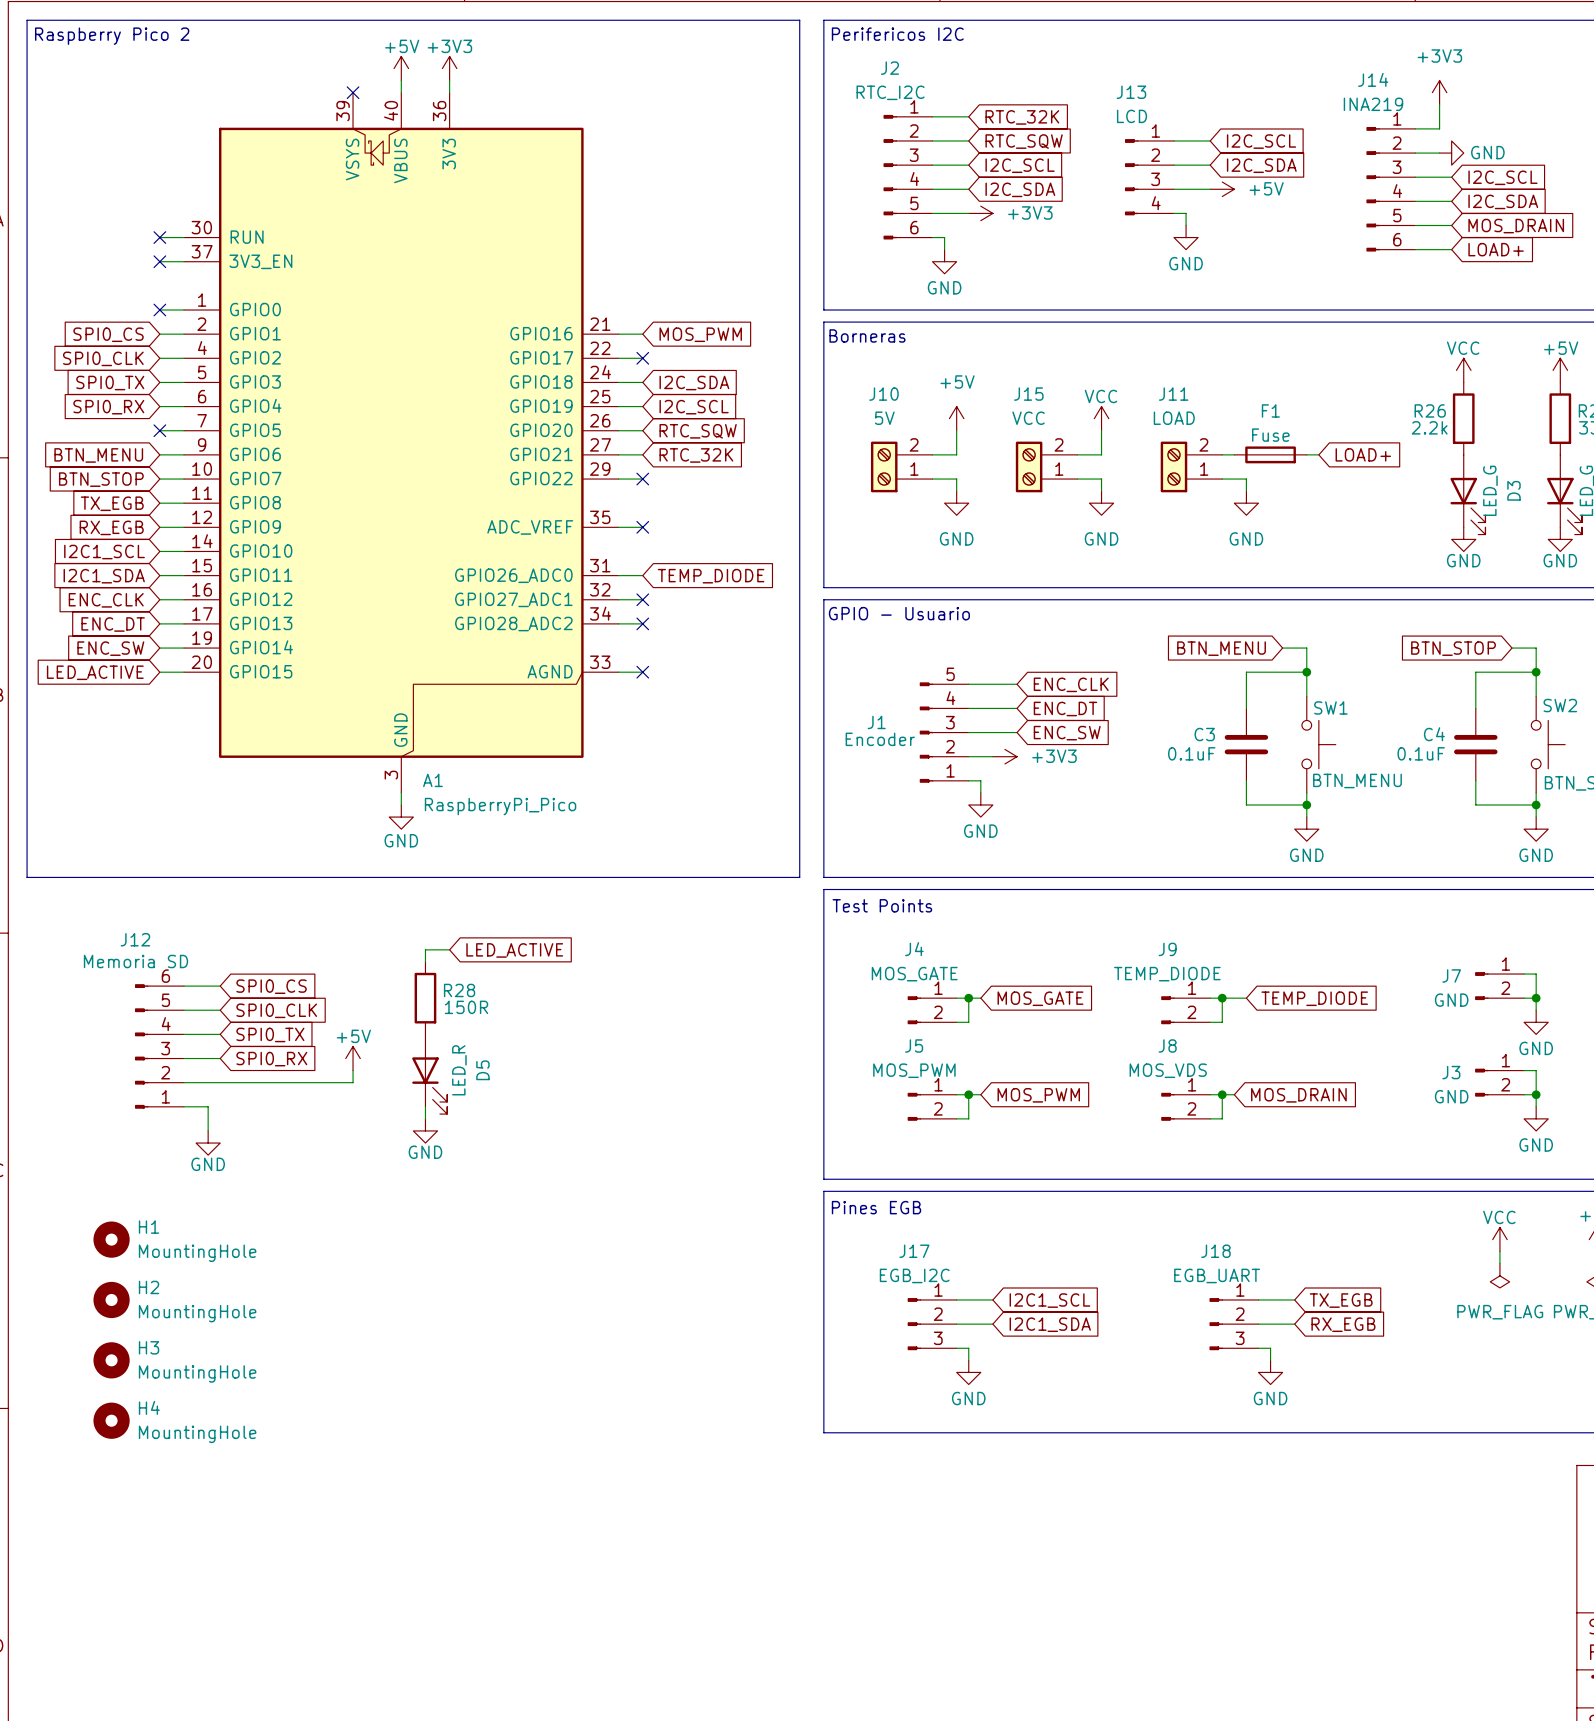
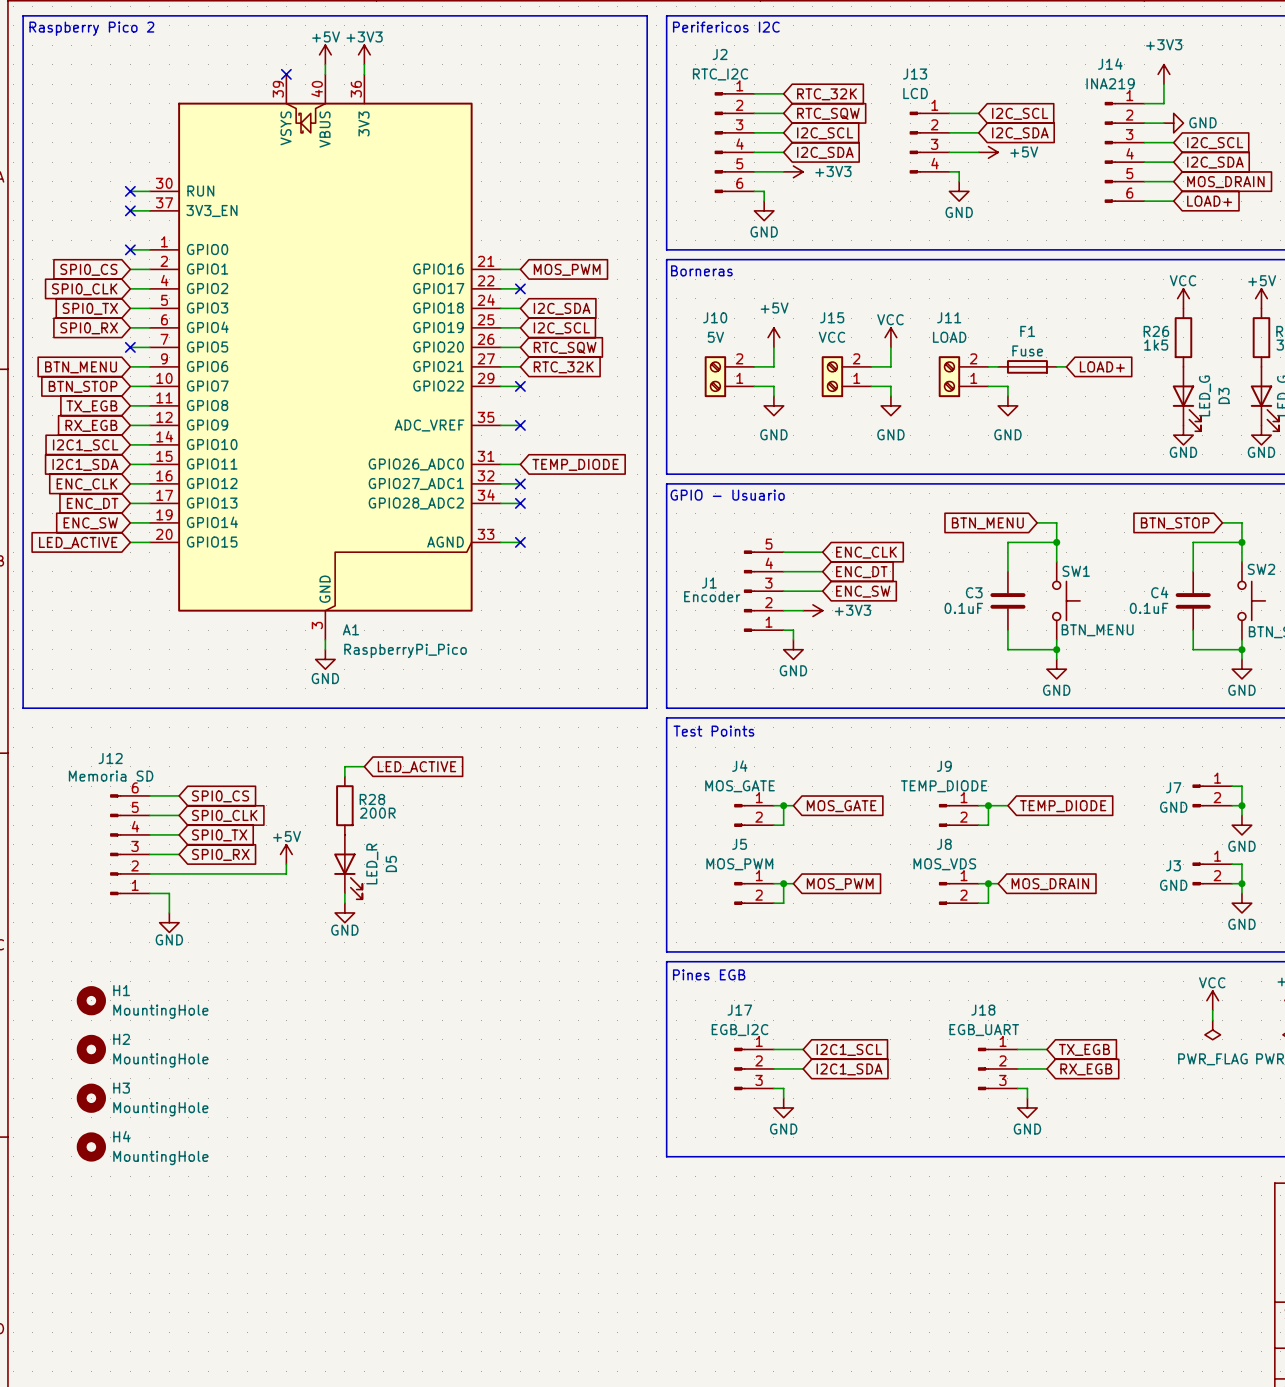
R26 value: 2.2k (1429, 427) -> 1k5 (1156, 345)
R28 value: 150R (466, 1007) -> 200R (377, 813)

